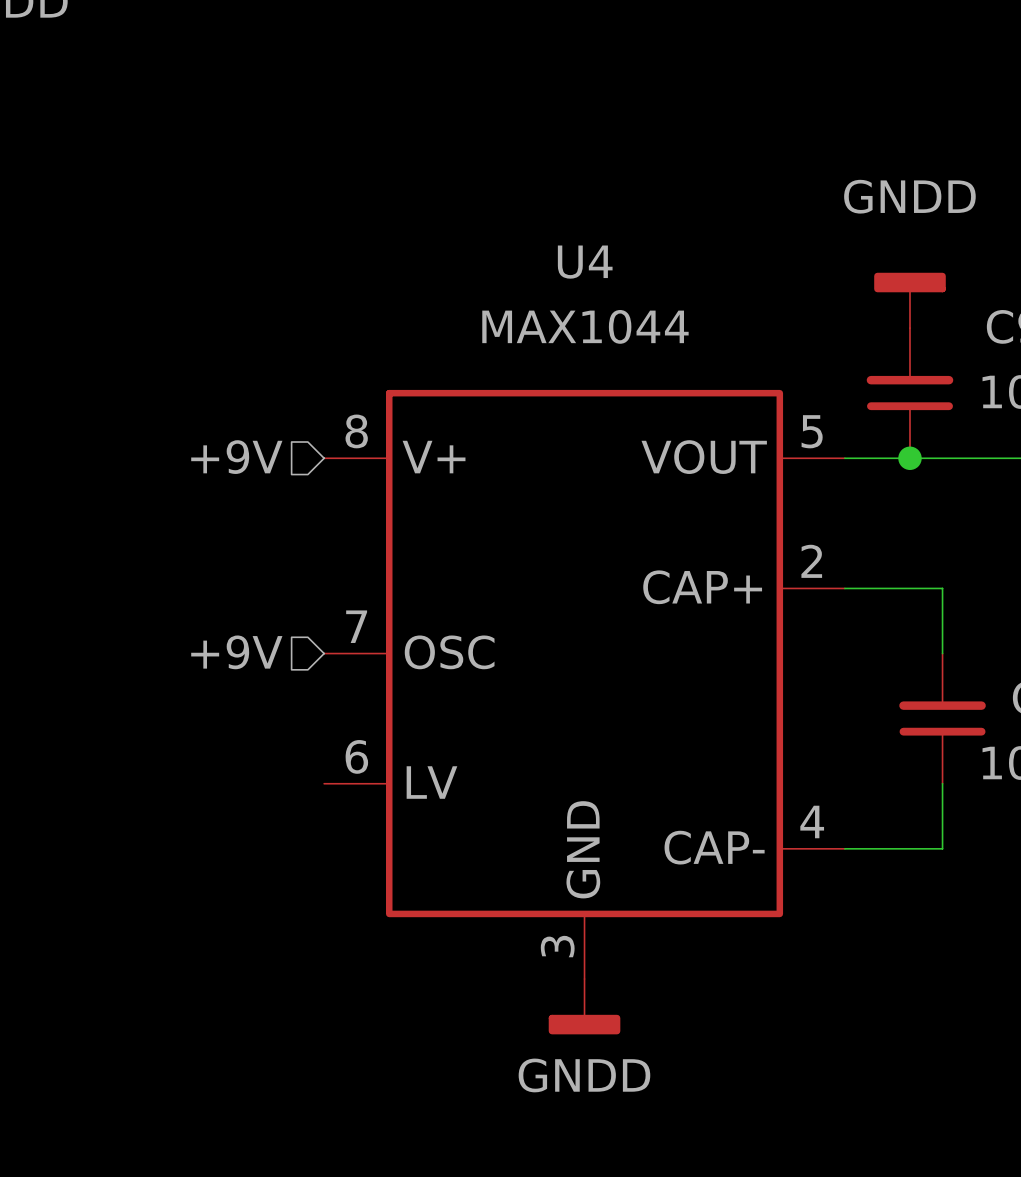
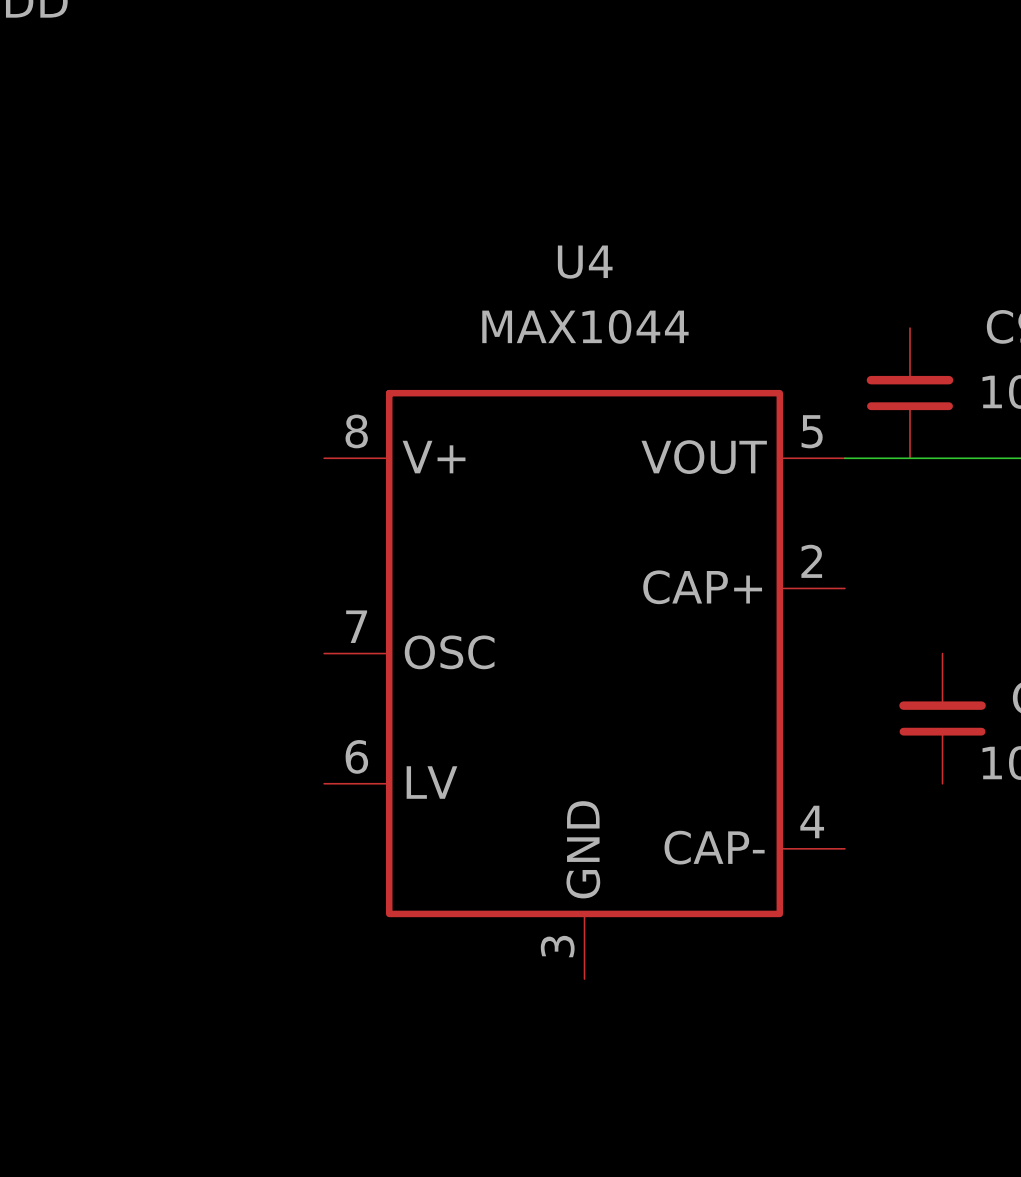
power symbol: GNDD (909, 300) -> none
hierarchical label: +9V (236, 457) -> none
junction: (909, 458) -> none
wire: (844, 588) (942, 588) (942, 653) -> none
hierarchical label: +9V (236, 652) -> none
wire: (942, 783) (942, 848) (844, 848) -> none
power symbol: GNDD (584, 1006) -> none

